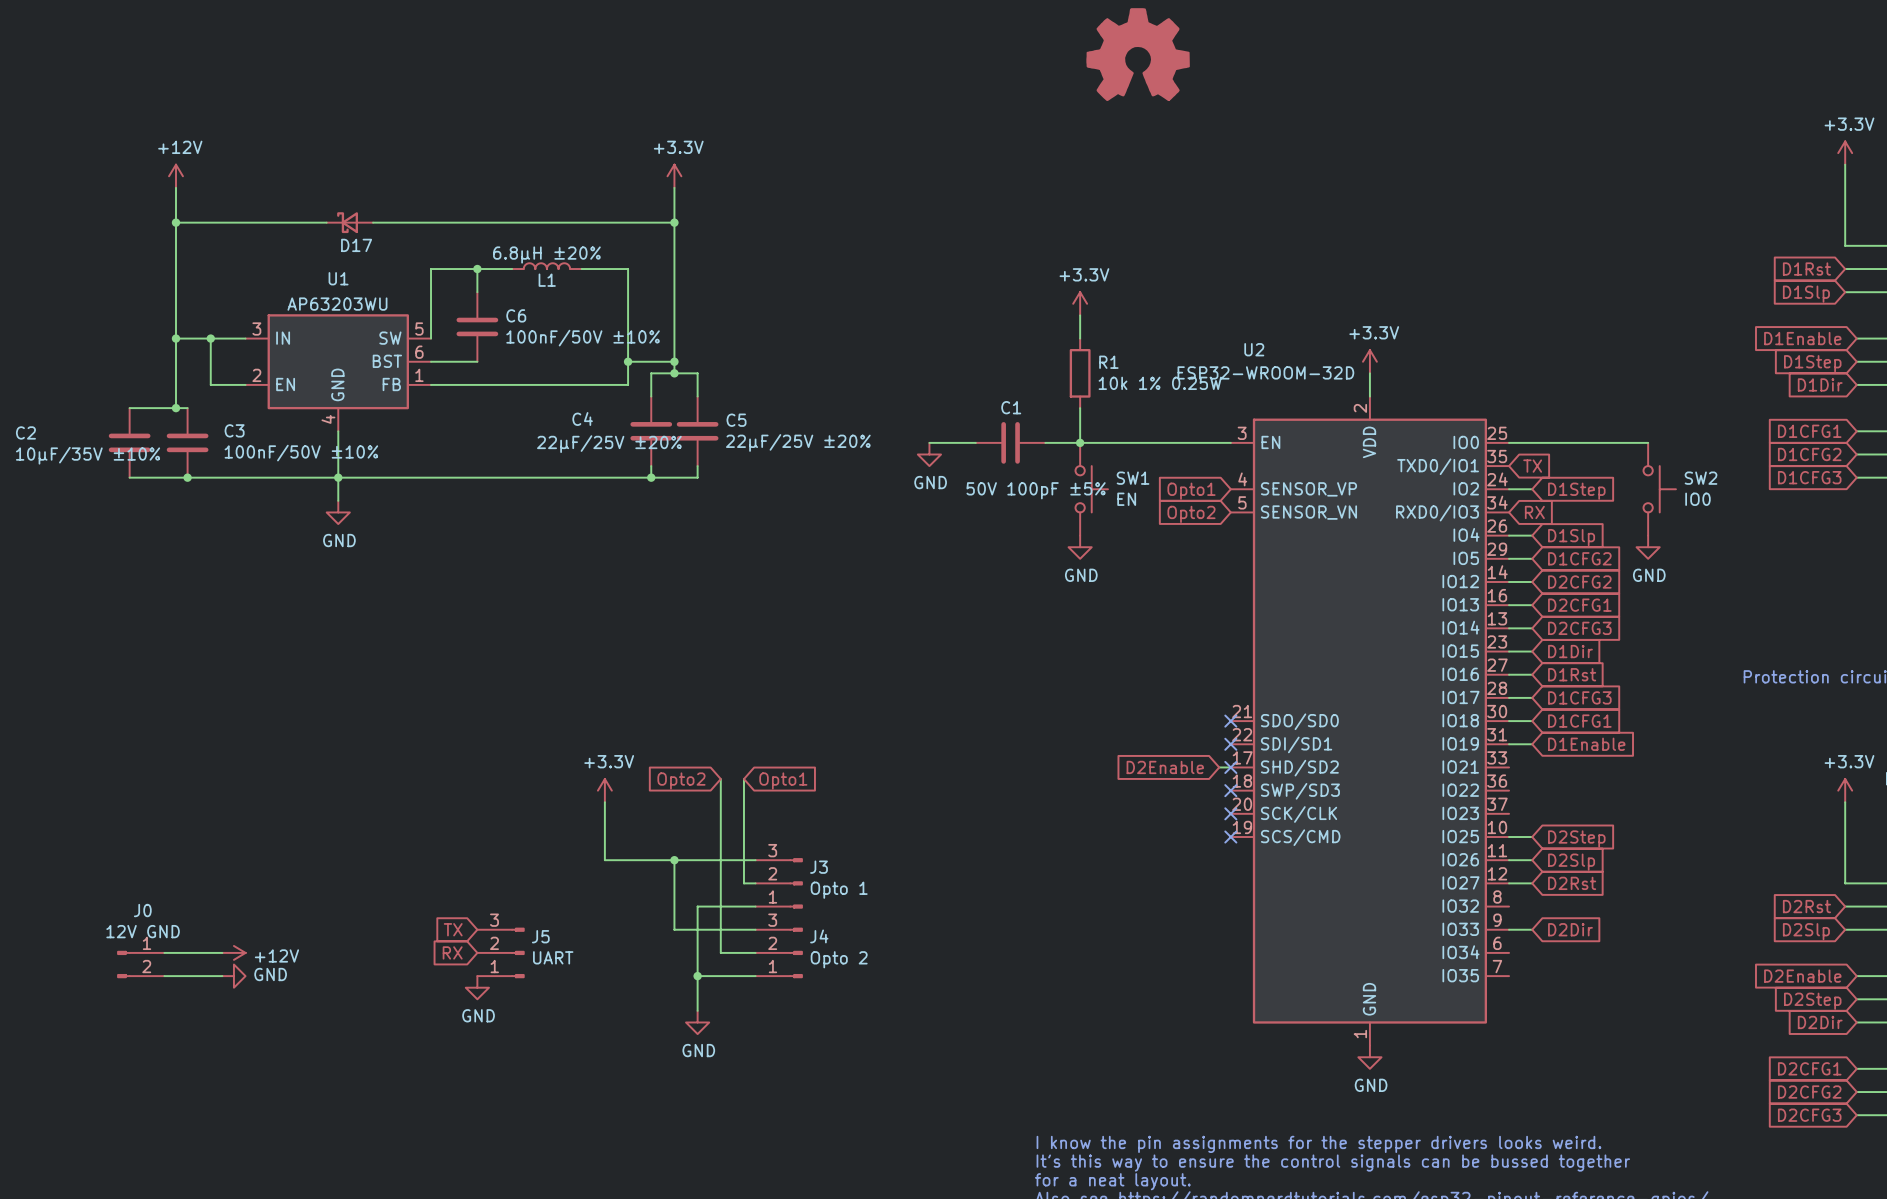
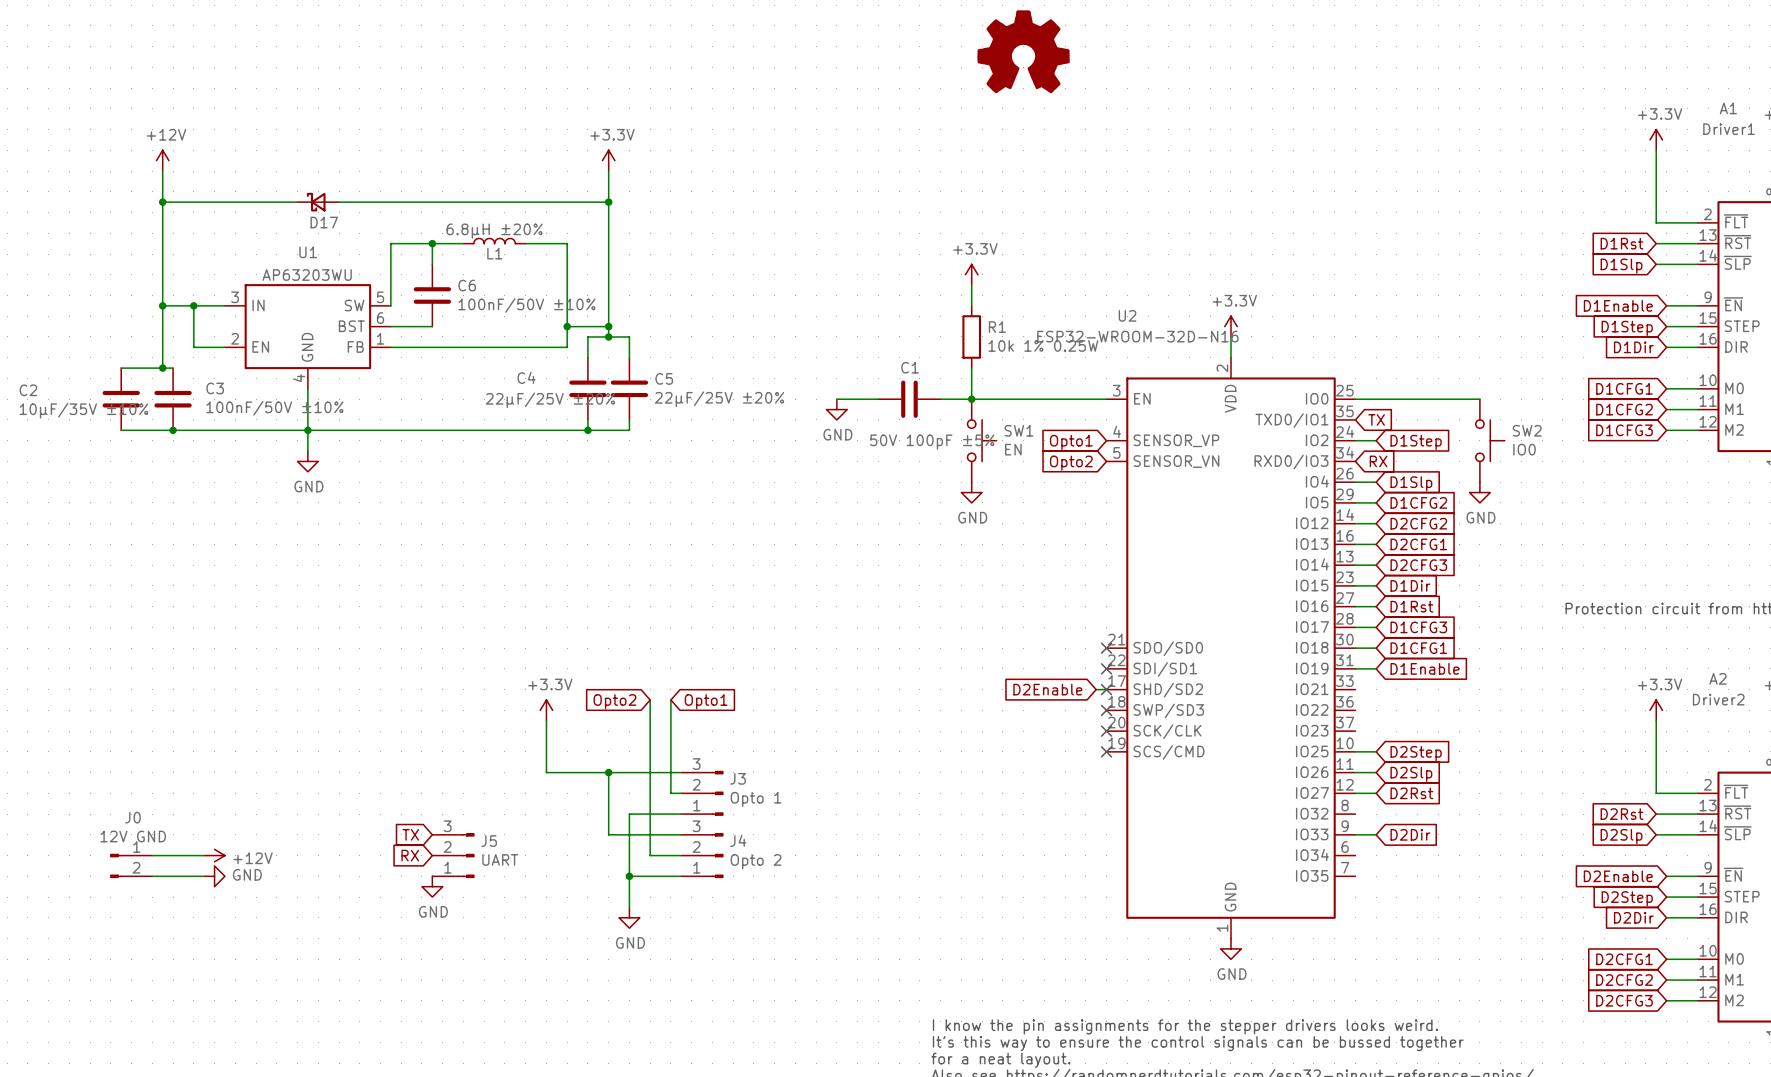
U2 value: ESP32-WROOM-32D (1265, 372) -> ESP32-WROOM-32D-N16 (1137, 336)

